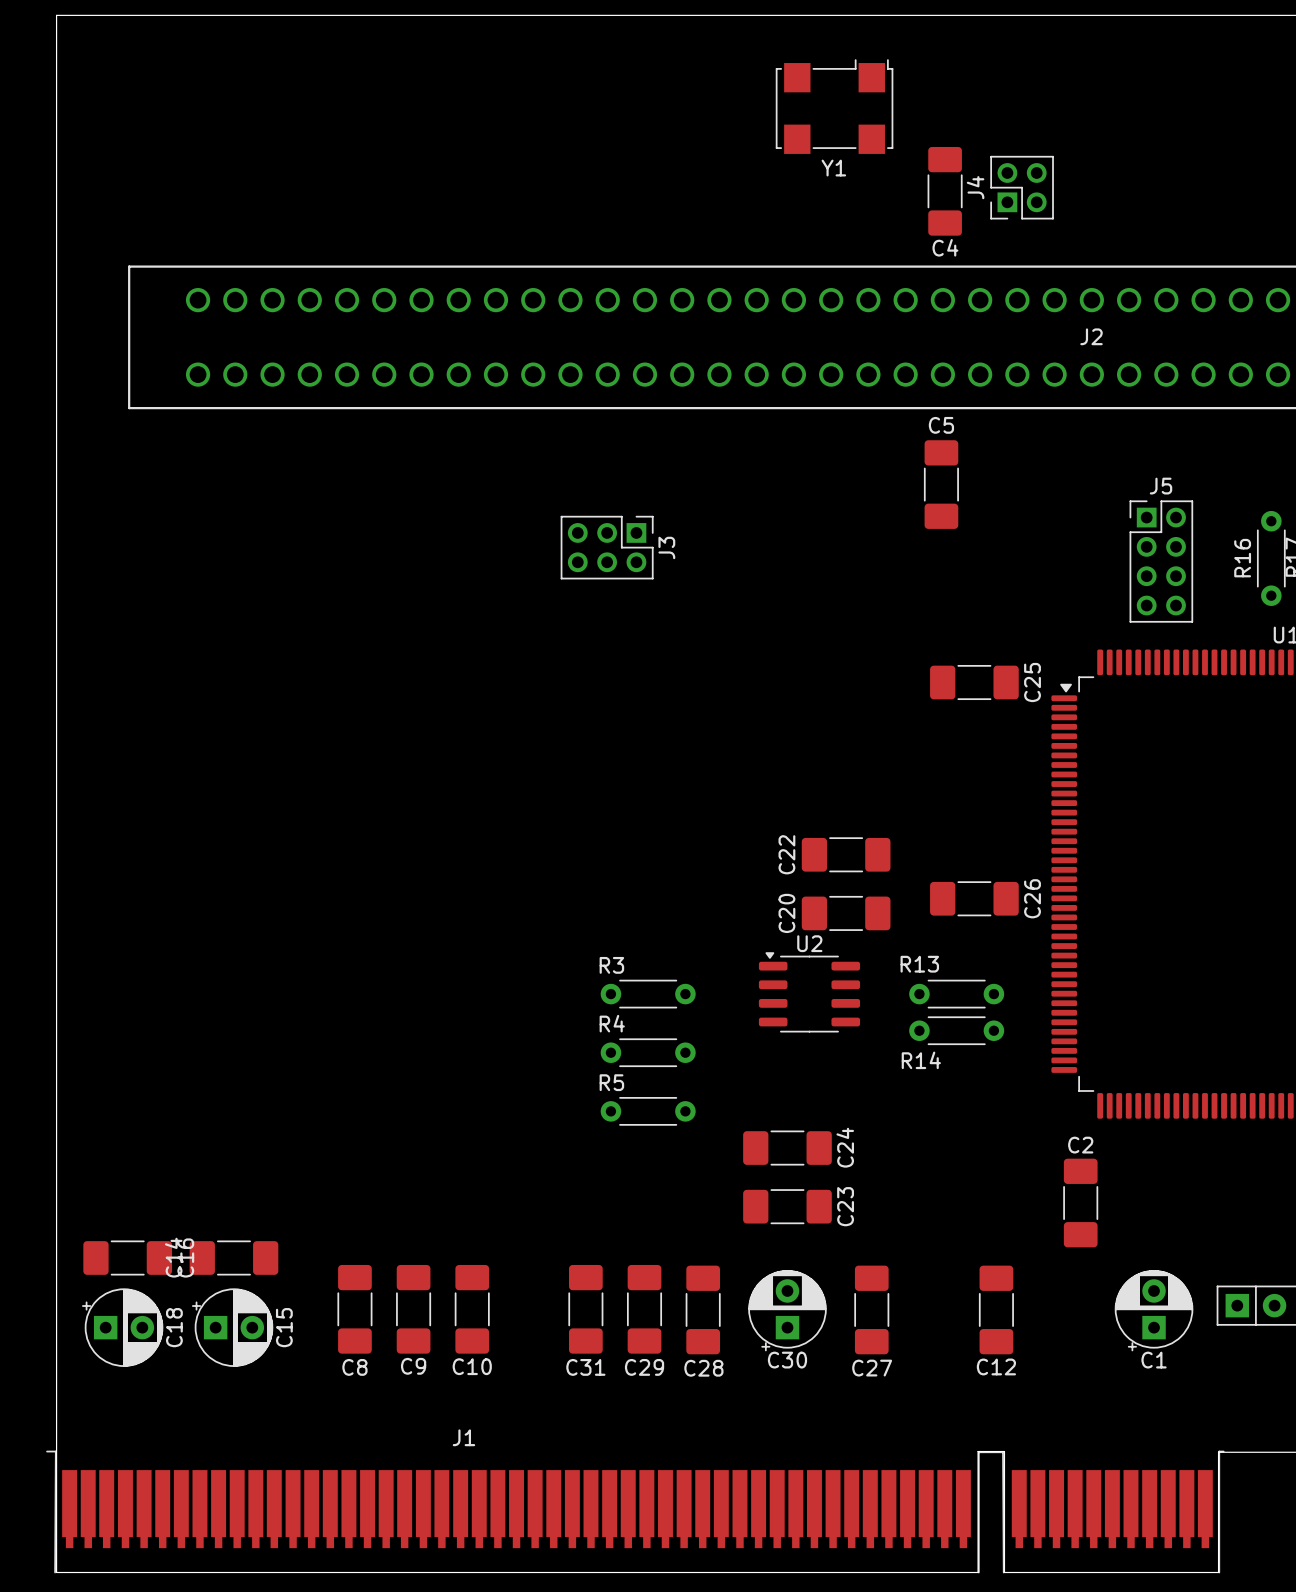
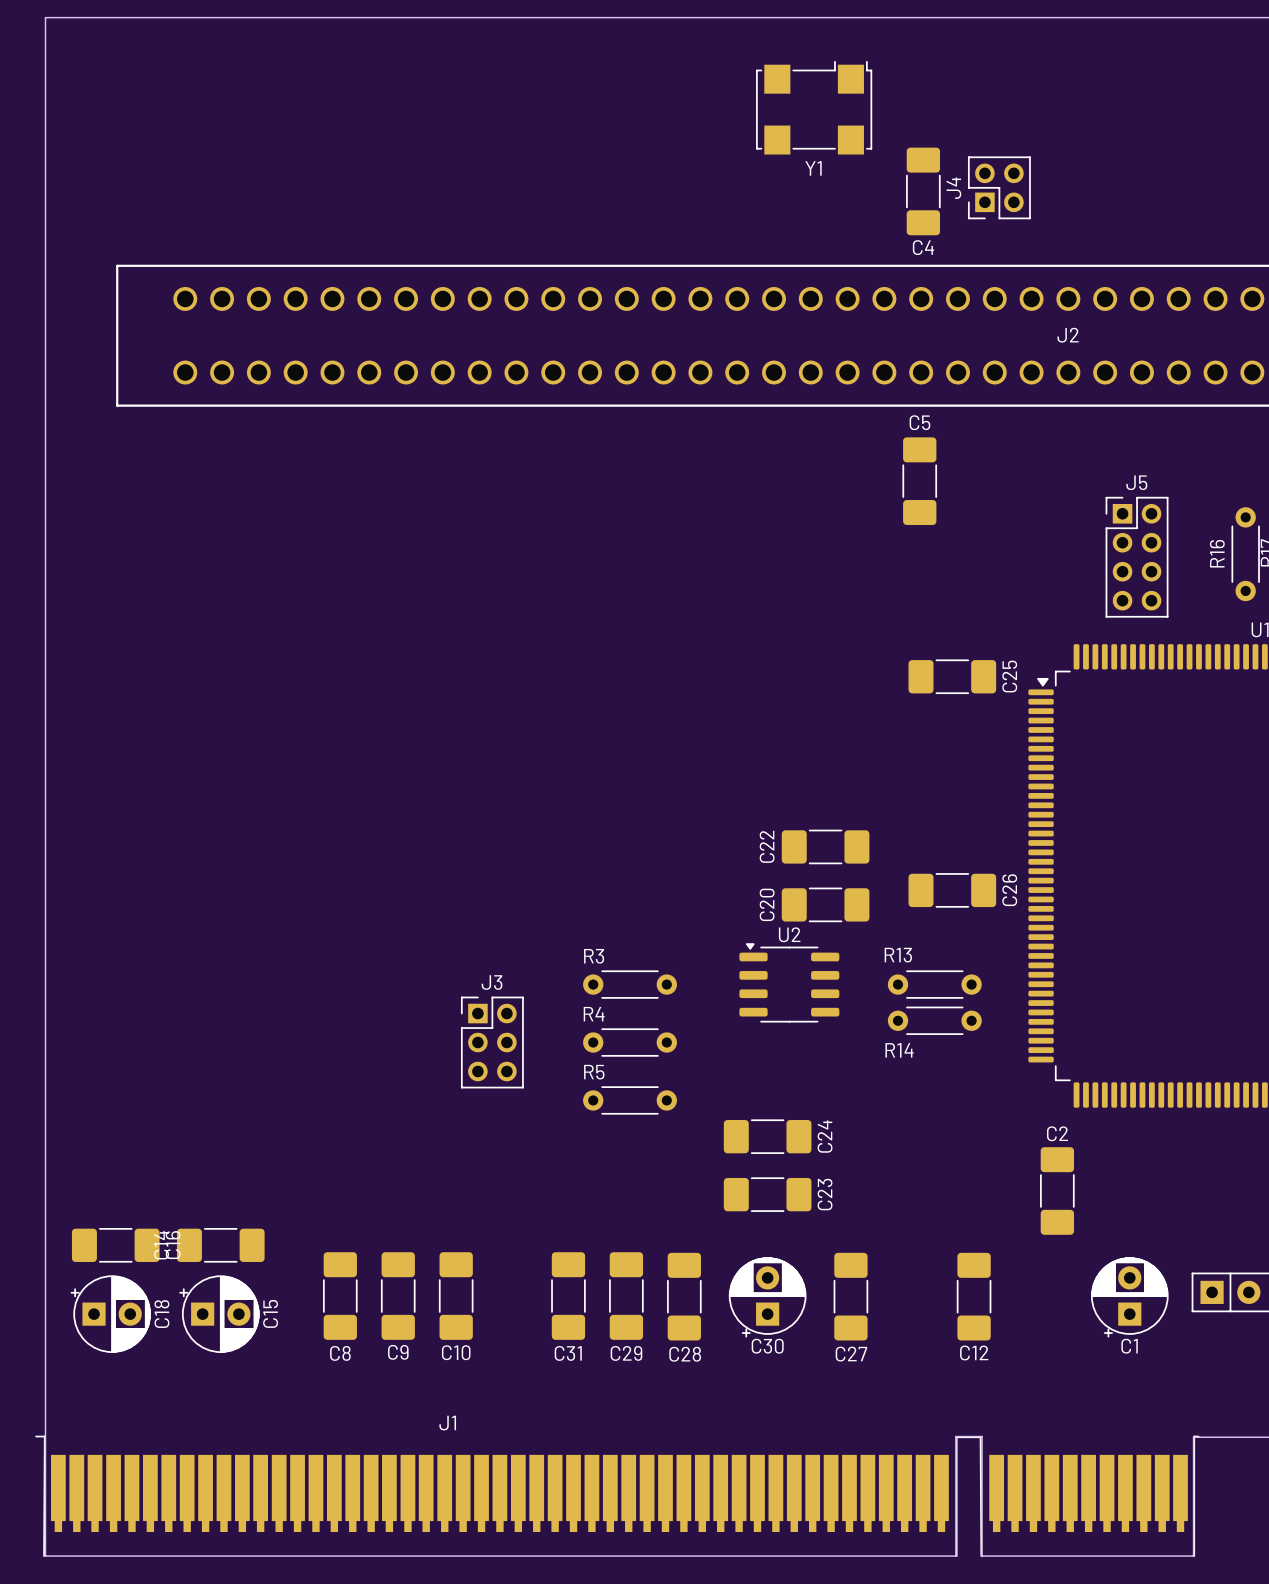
J3 rotation: 0° (607, 547) -> 90° counterclockwise (492, 1042)
J3 position: (607, 547) -> (492, 1042)

